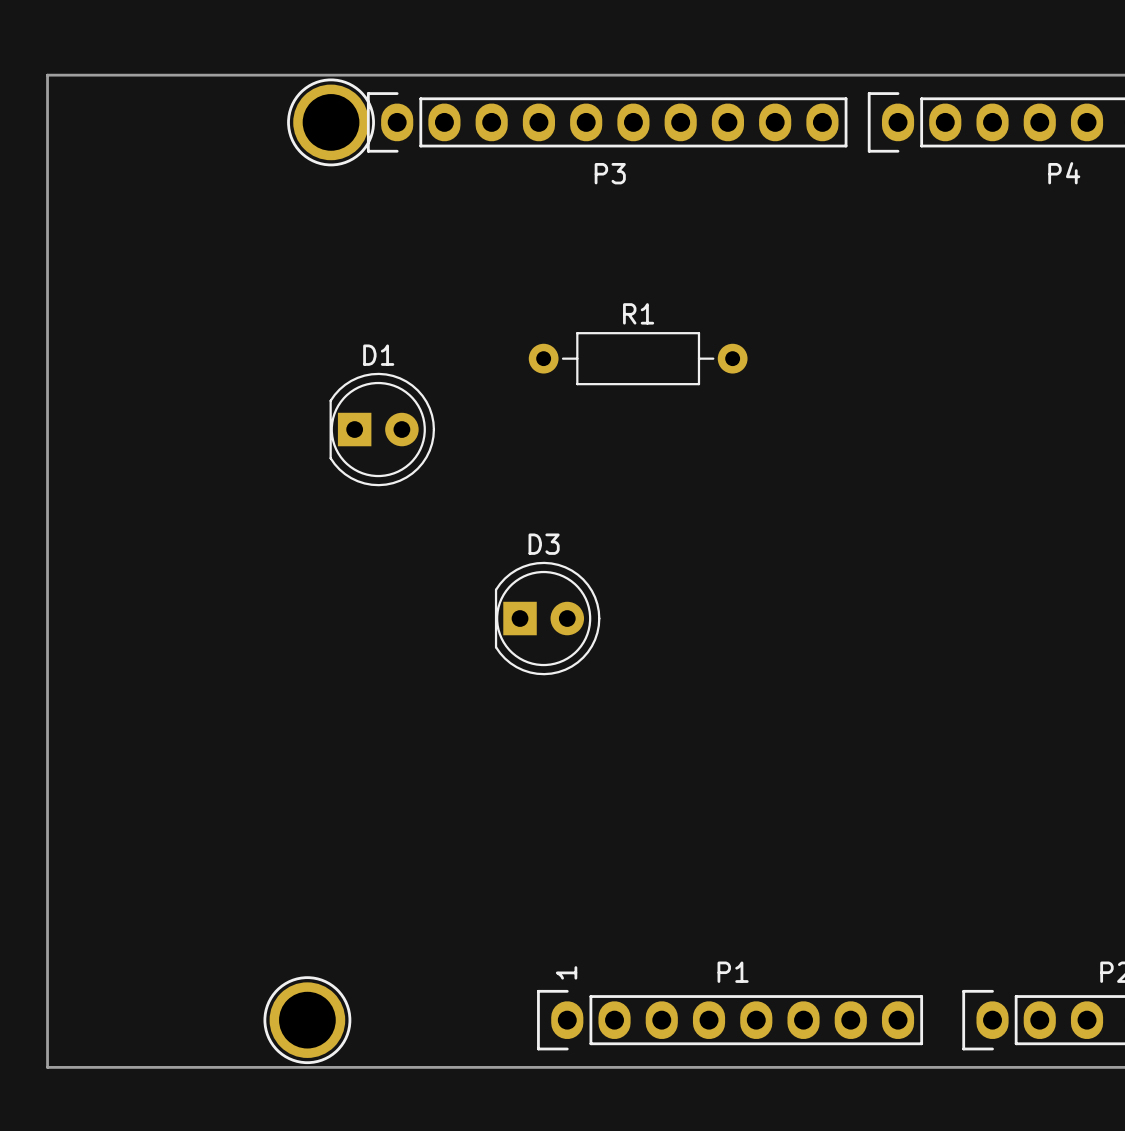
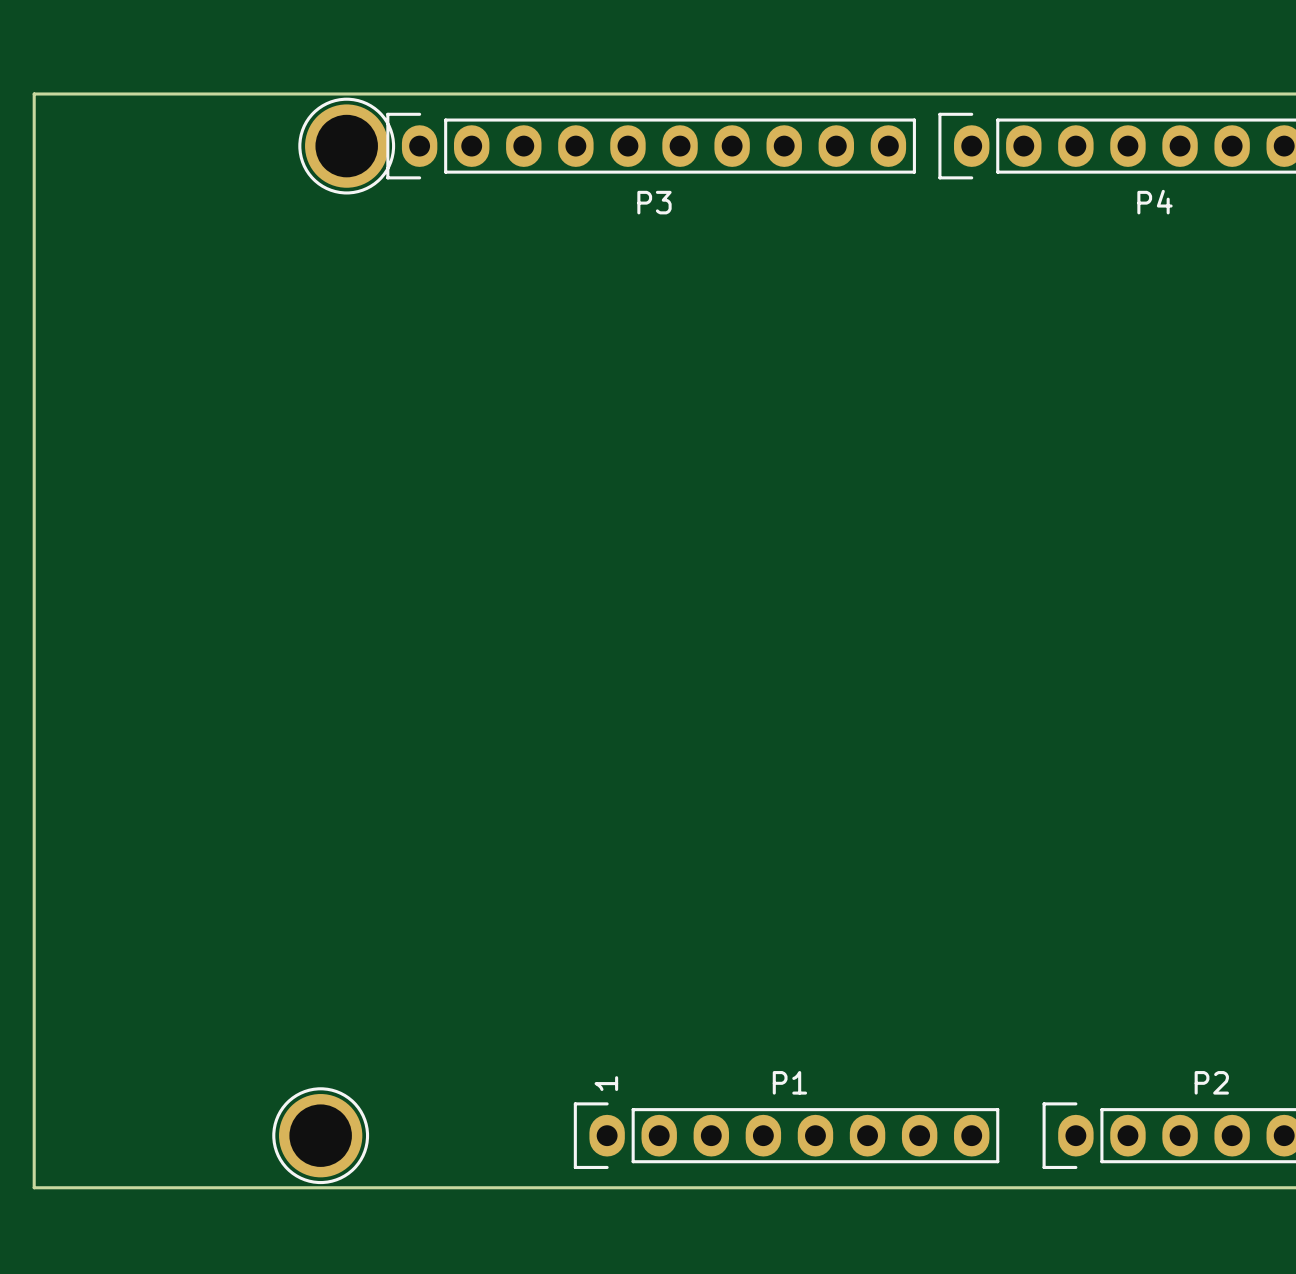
R1: (638, 358) -> none
D1: (382, 429) -> none
D3: (547, 618) -> none

